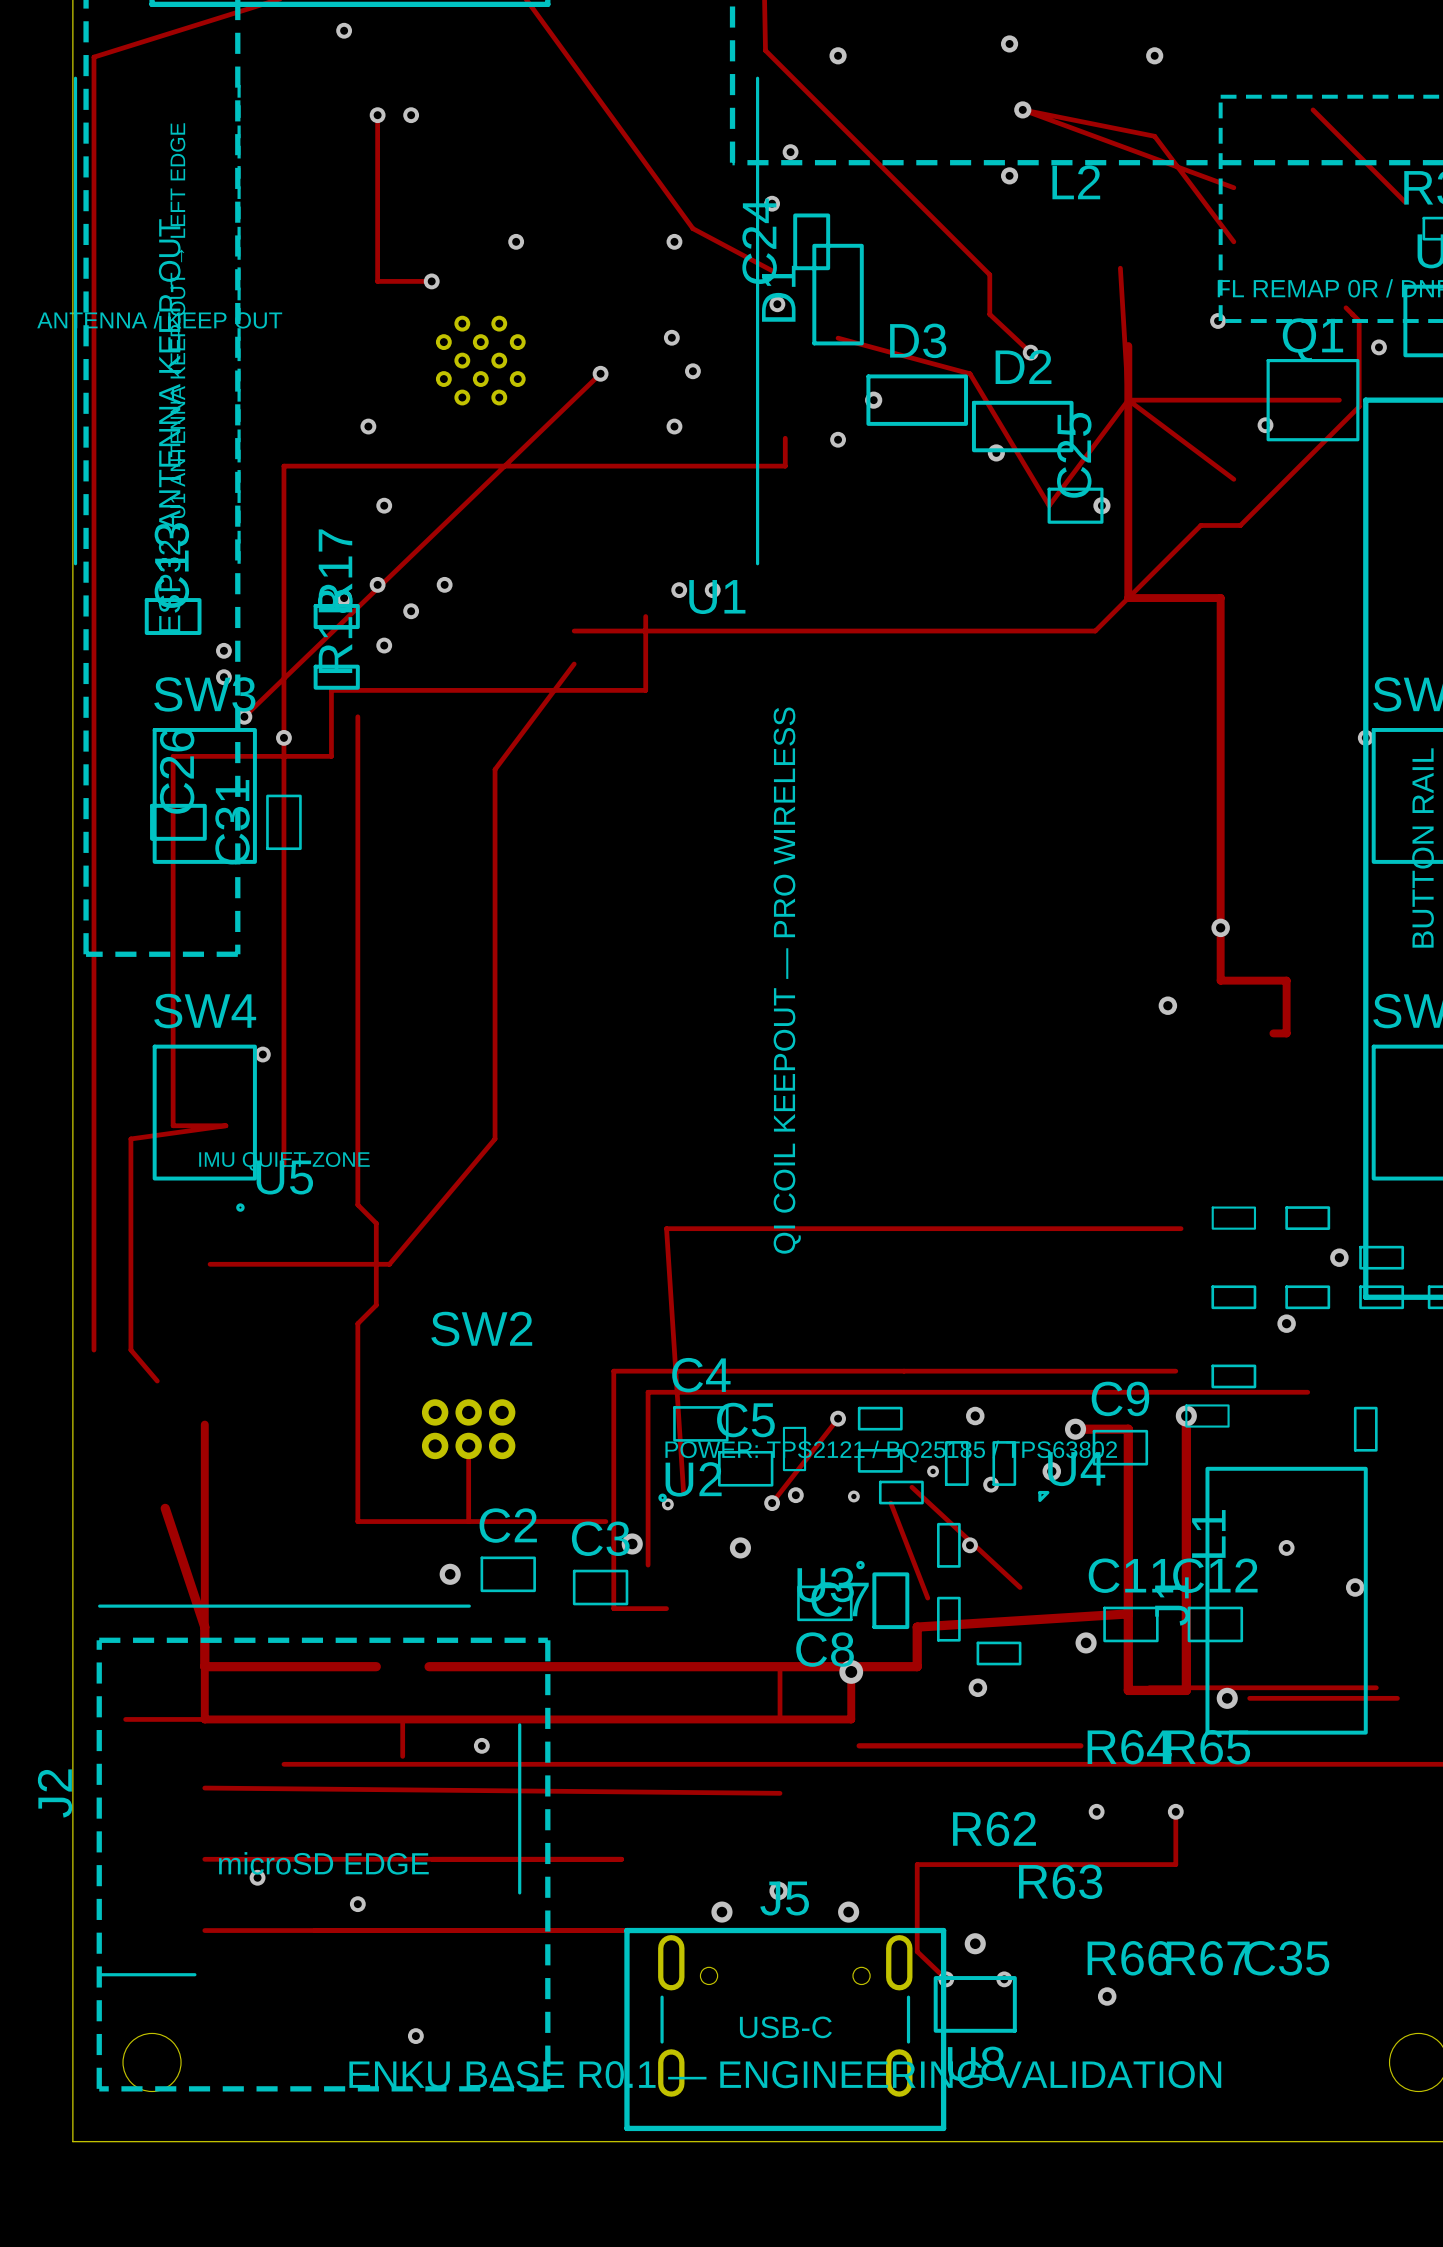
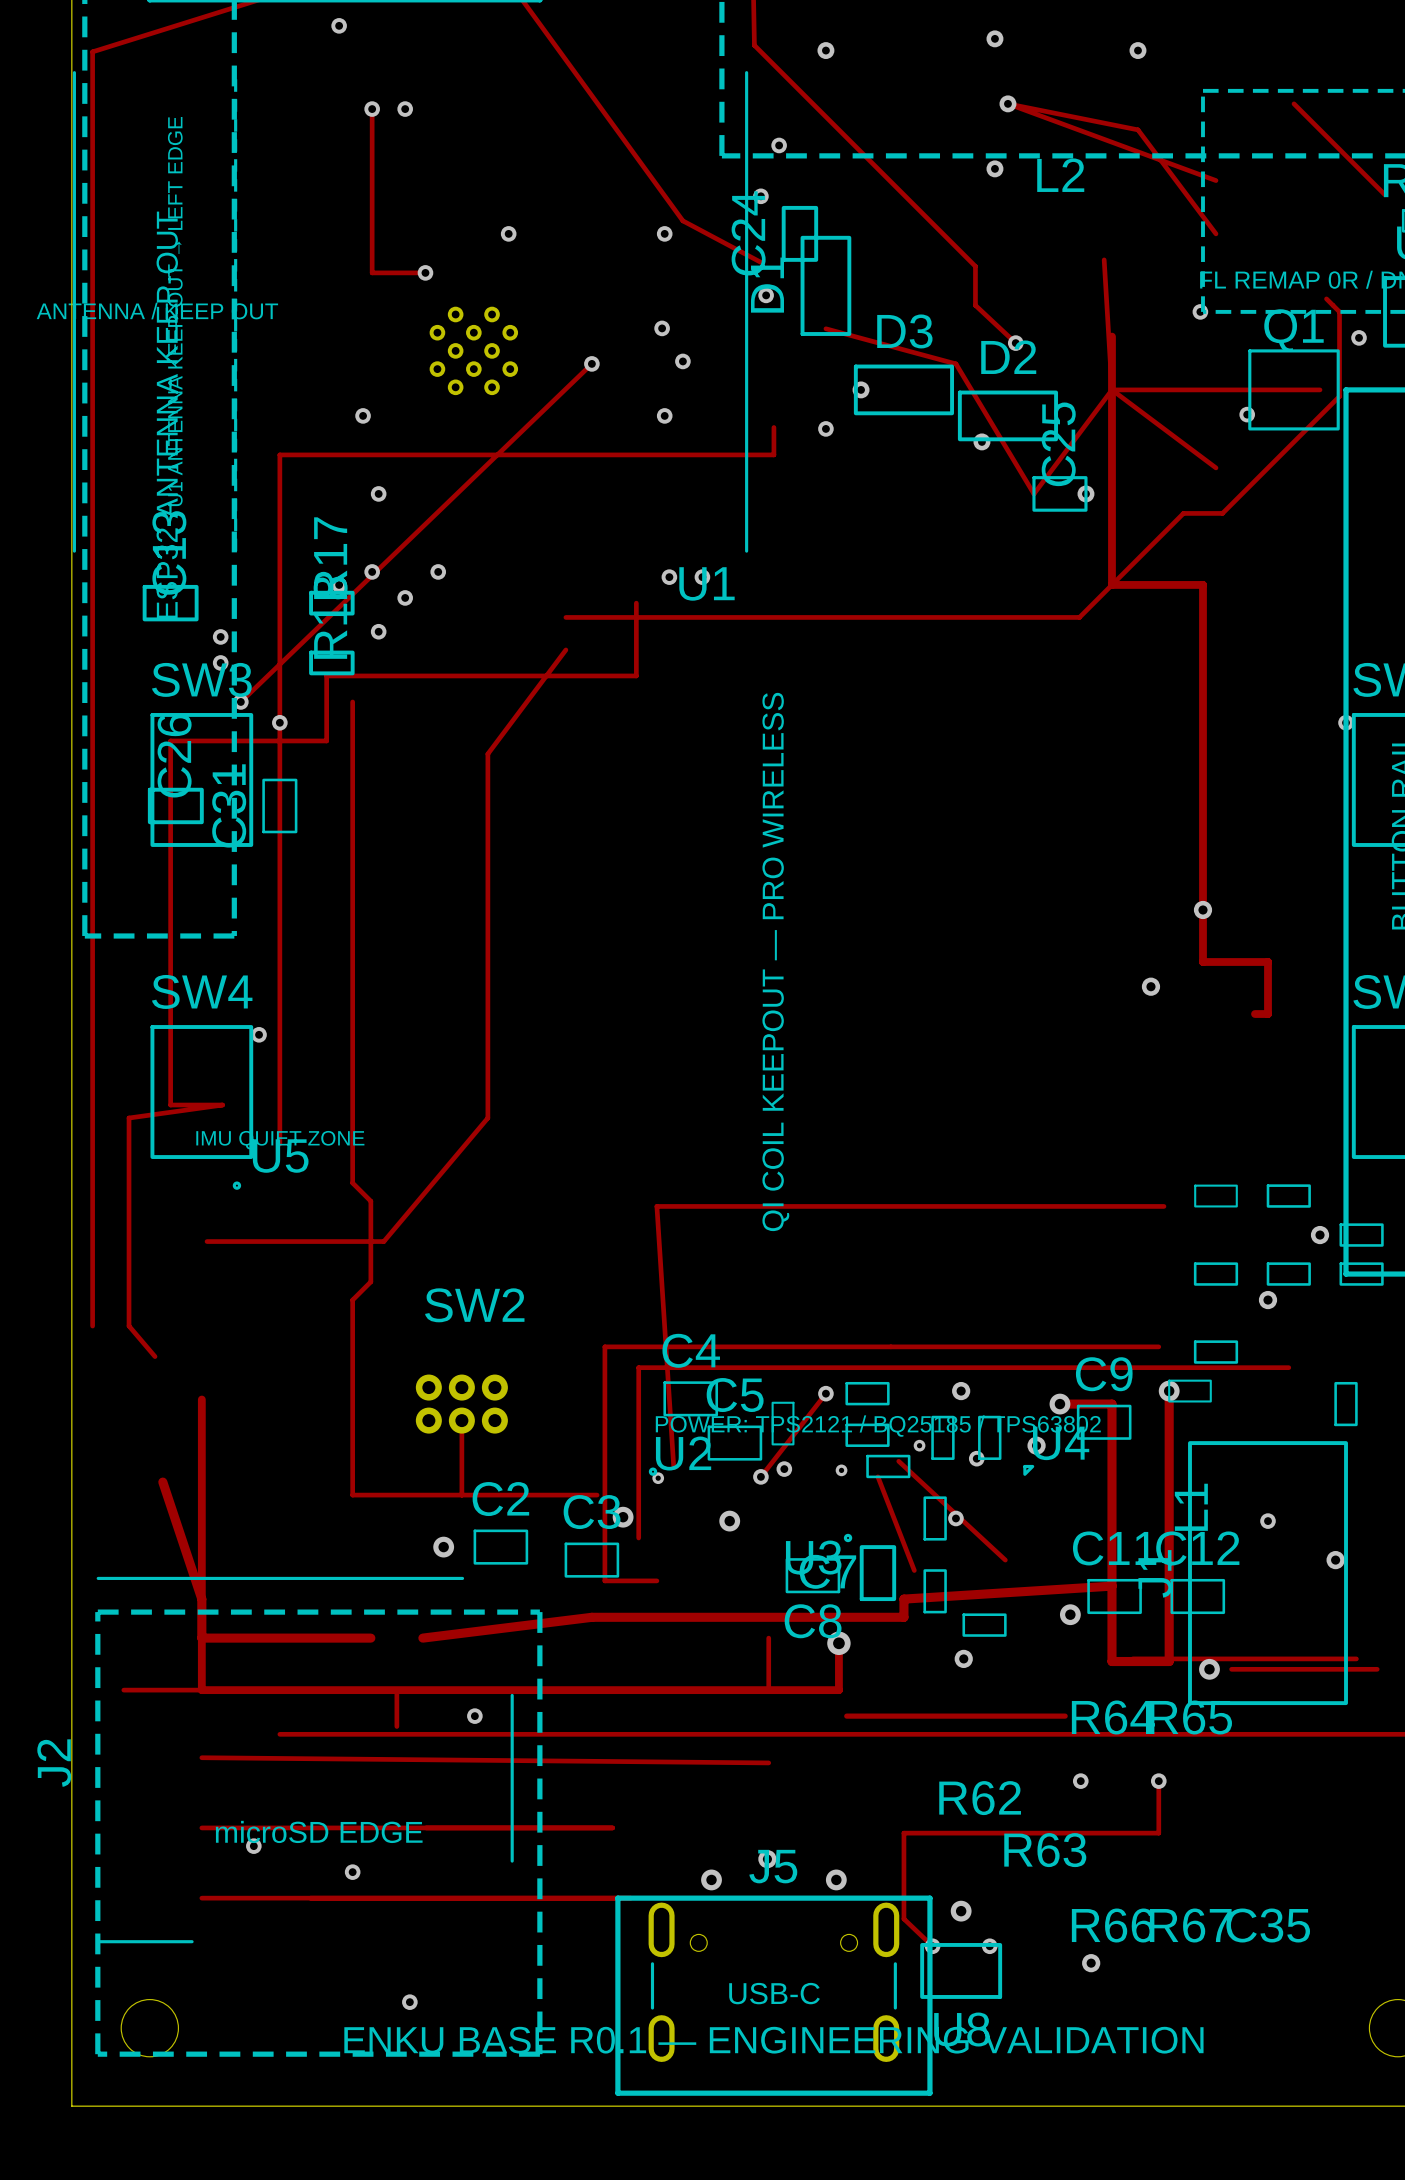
track: (917, 1645) (917, 1666) (429, 1666) -> (903, 1617) (591, 1617) (422, 1638)

